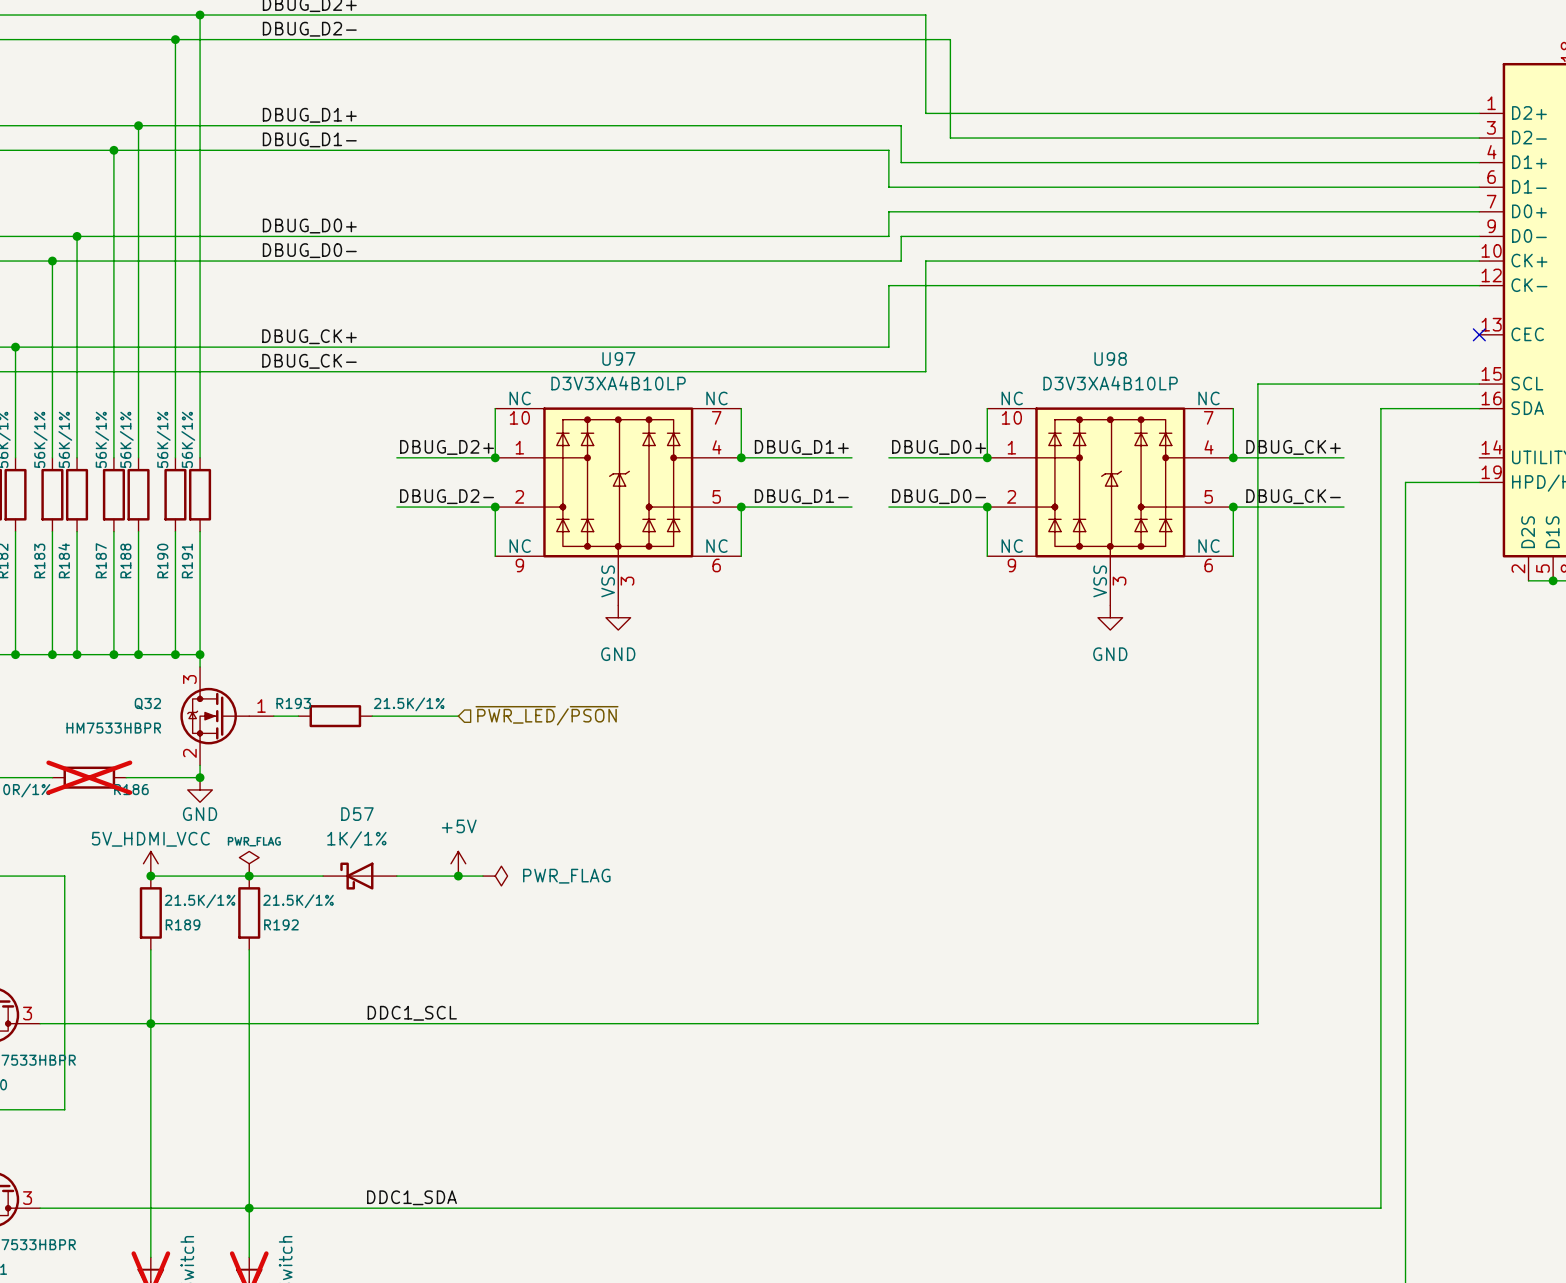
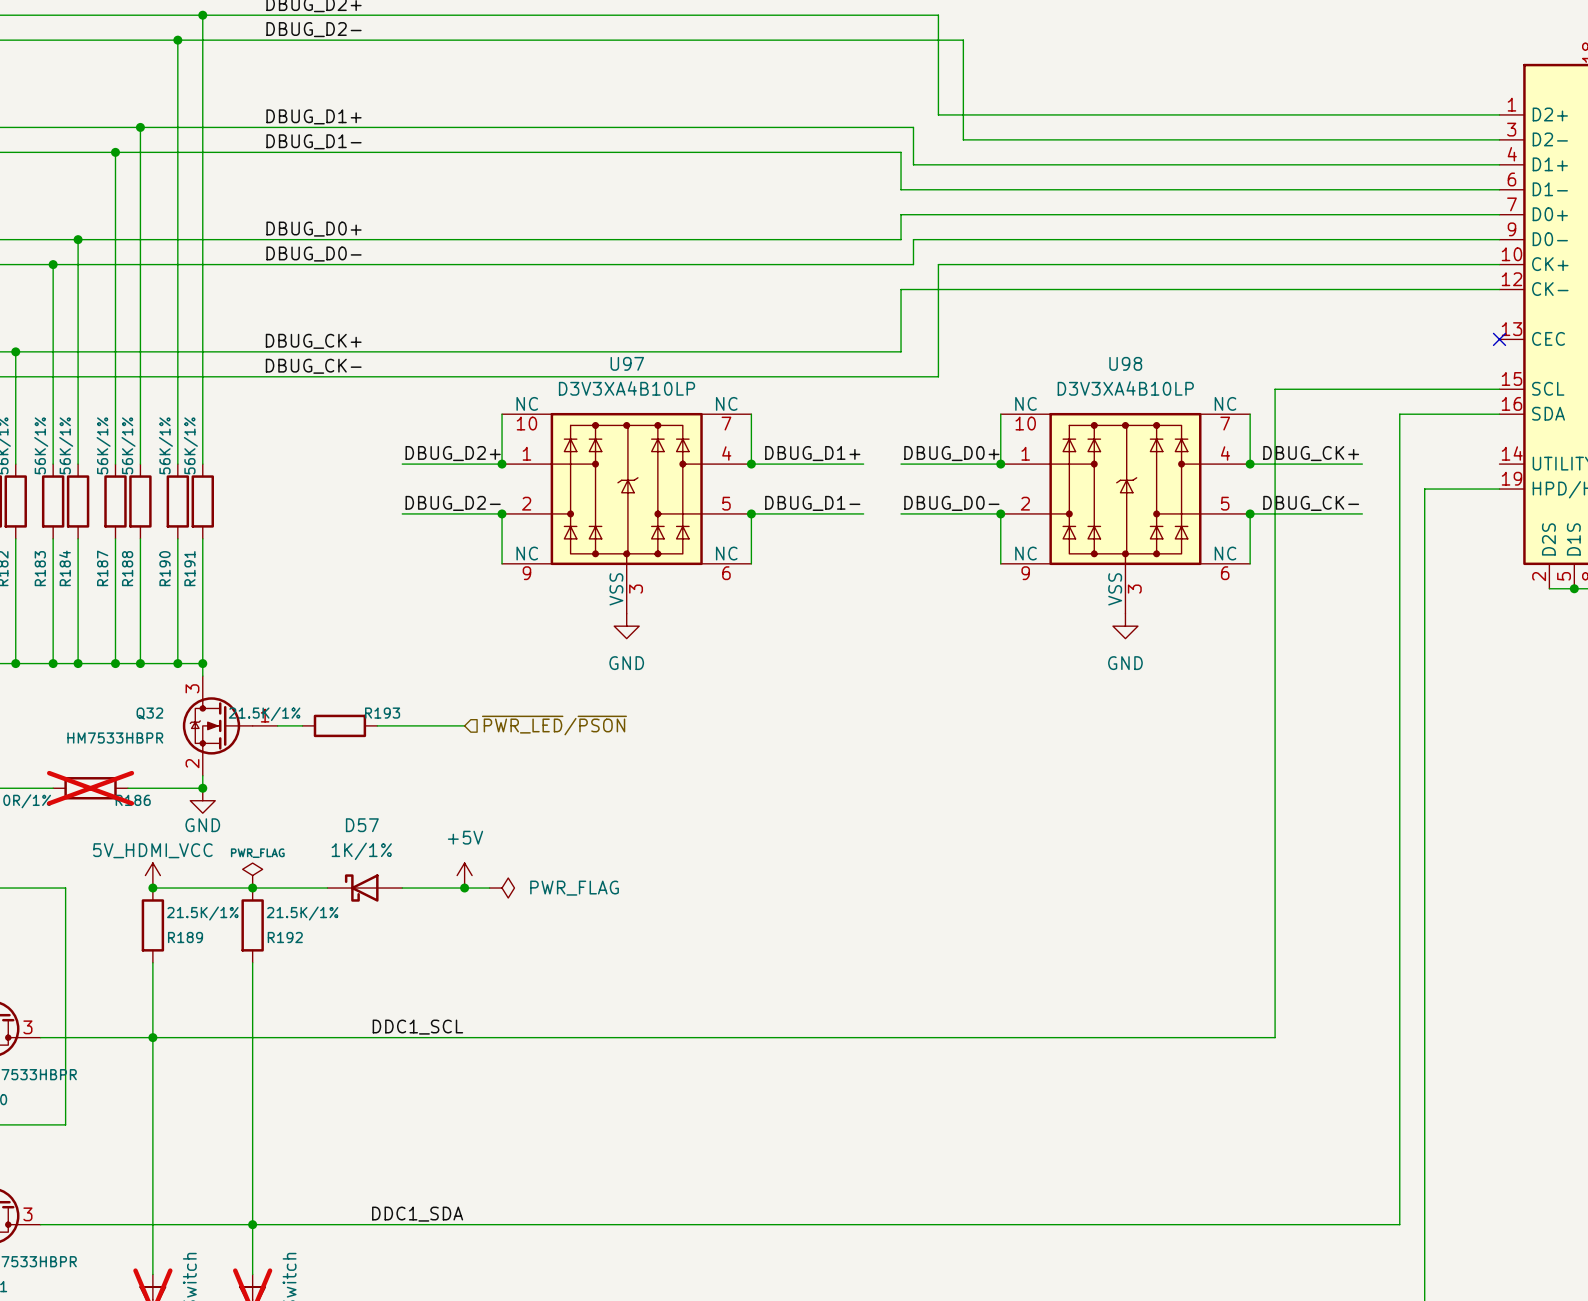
R193 name position: R193 (293, 703) -> R193 (382, 713)
R193 value position: 21.5K/1% (409, 704) -> 21.5K/1% (264, 714)

